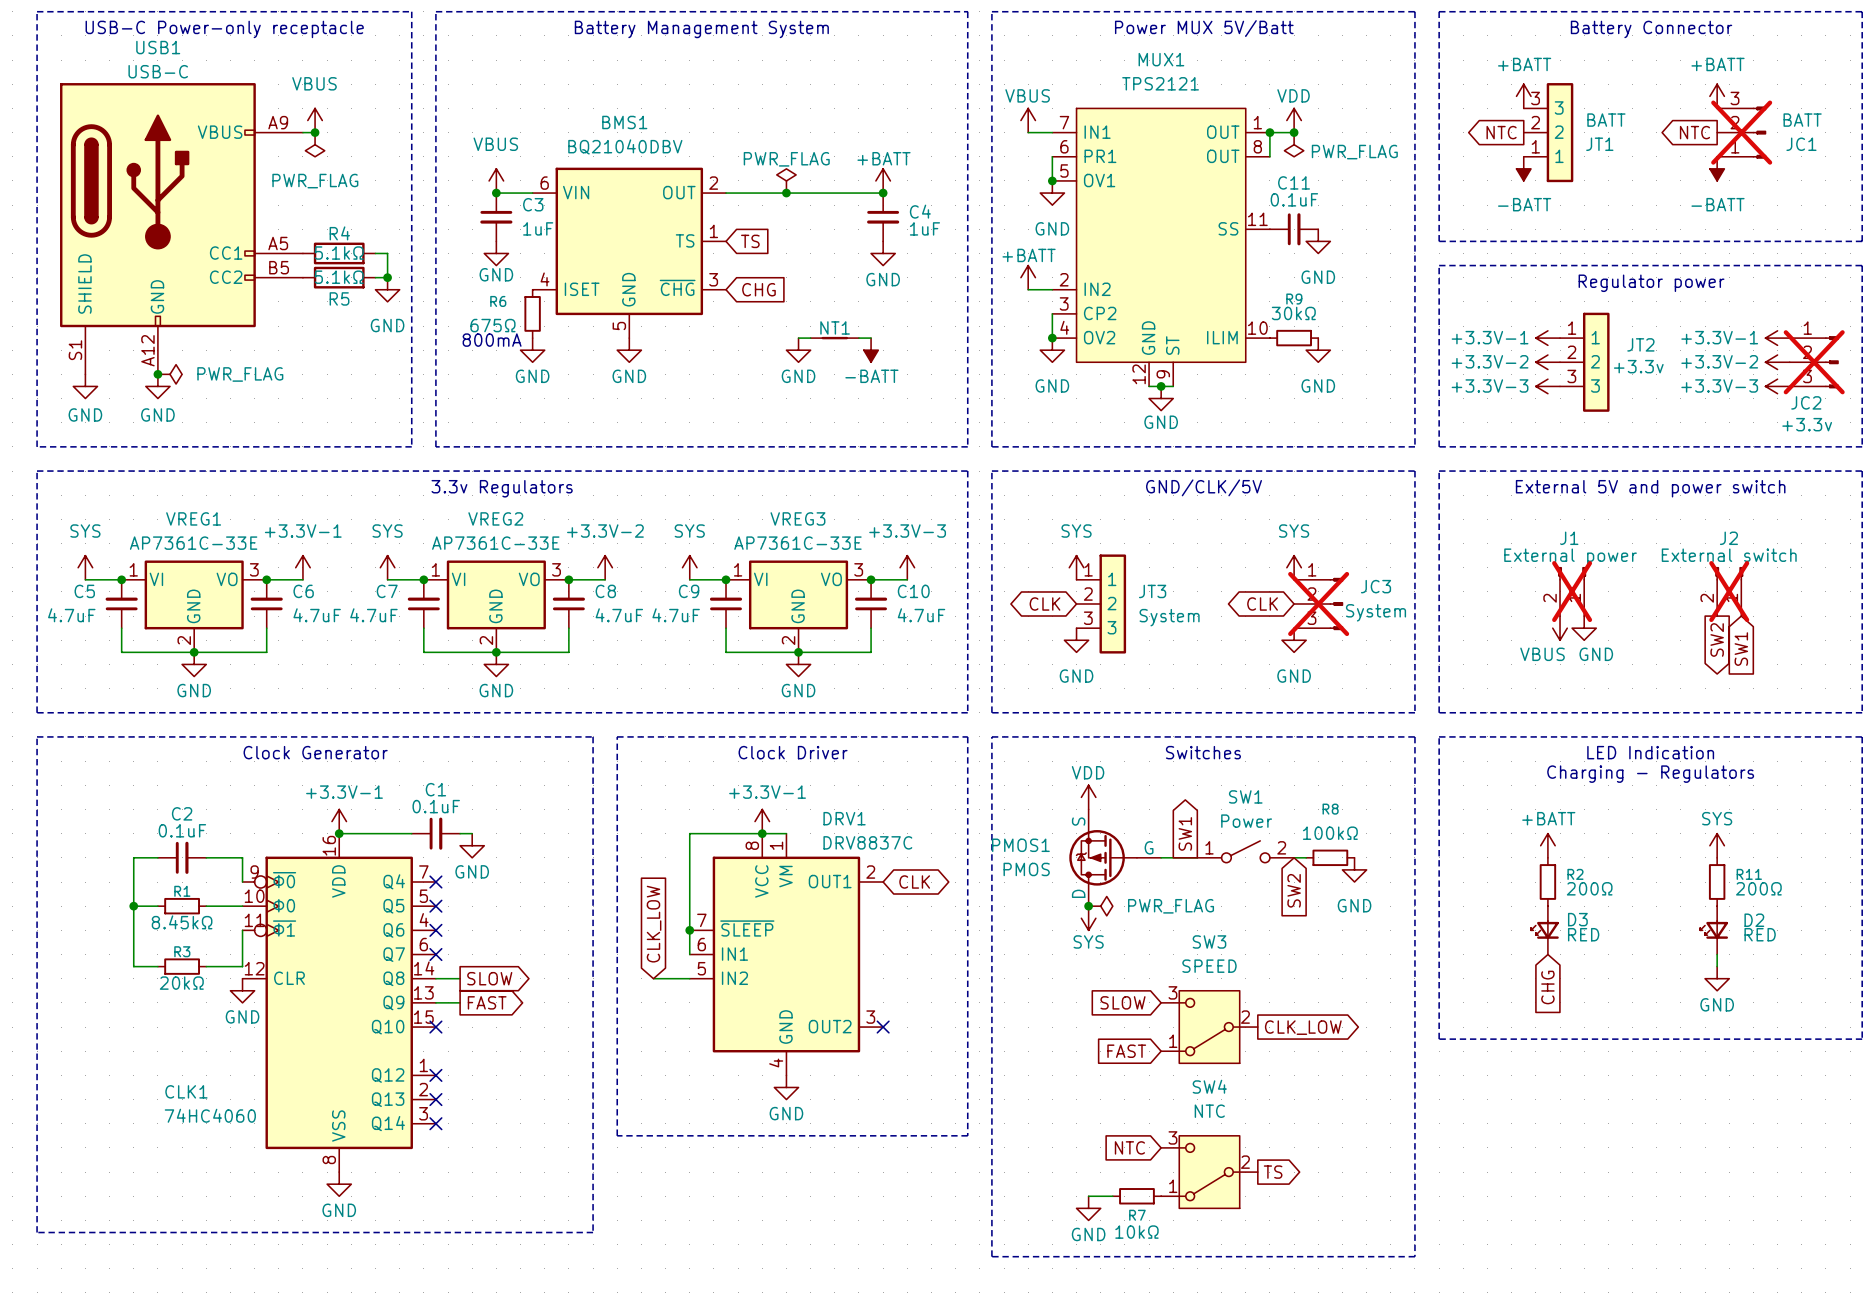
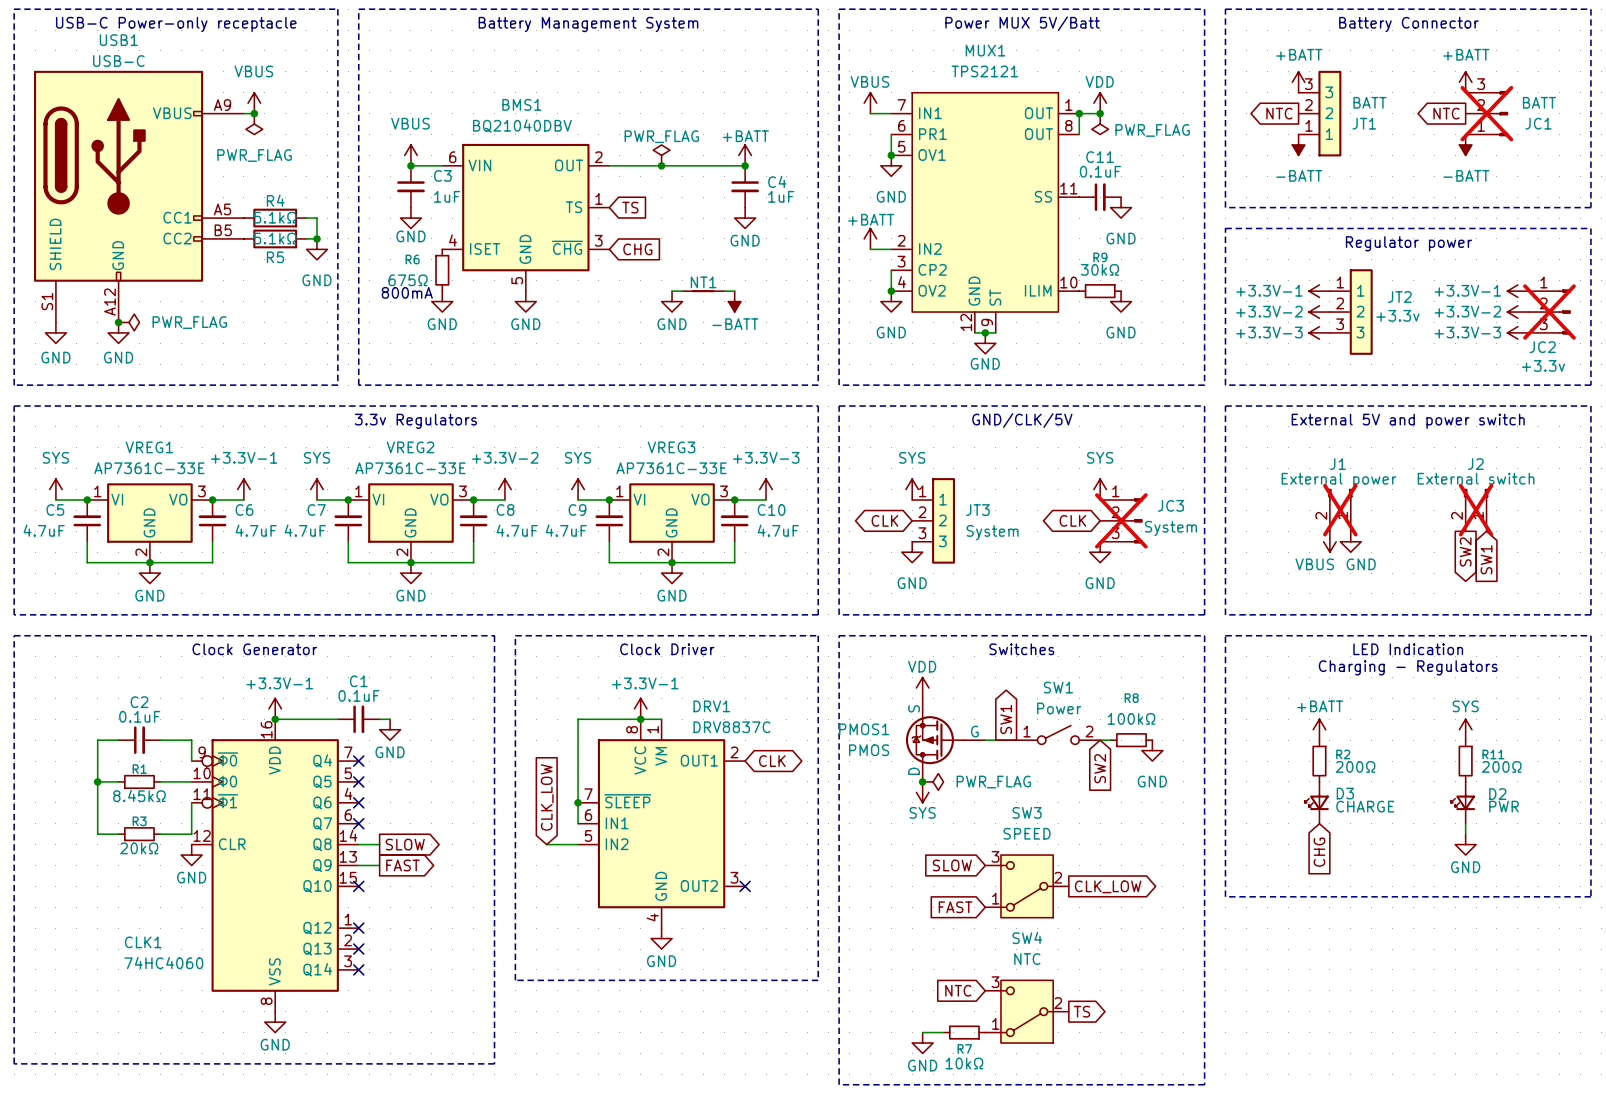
D3 value: RED (1583, 934) -> CHARGE (1365, 806)
D2 value: RED (1760, 934) -> PWR (1504, 806)

